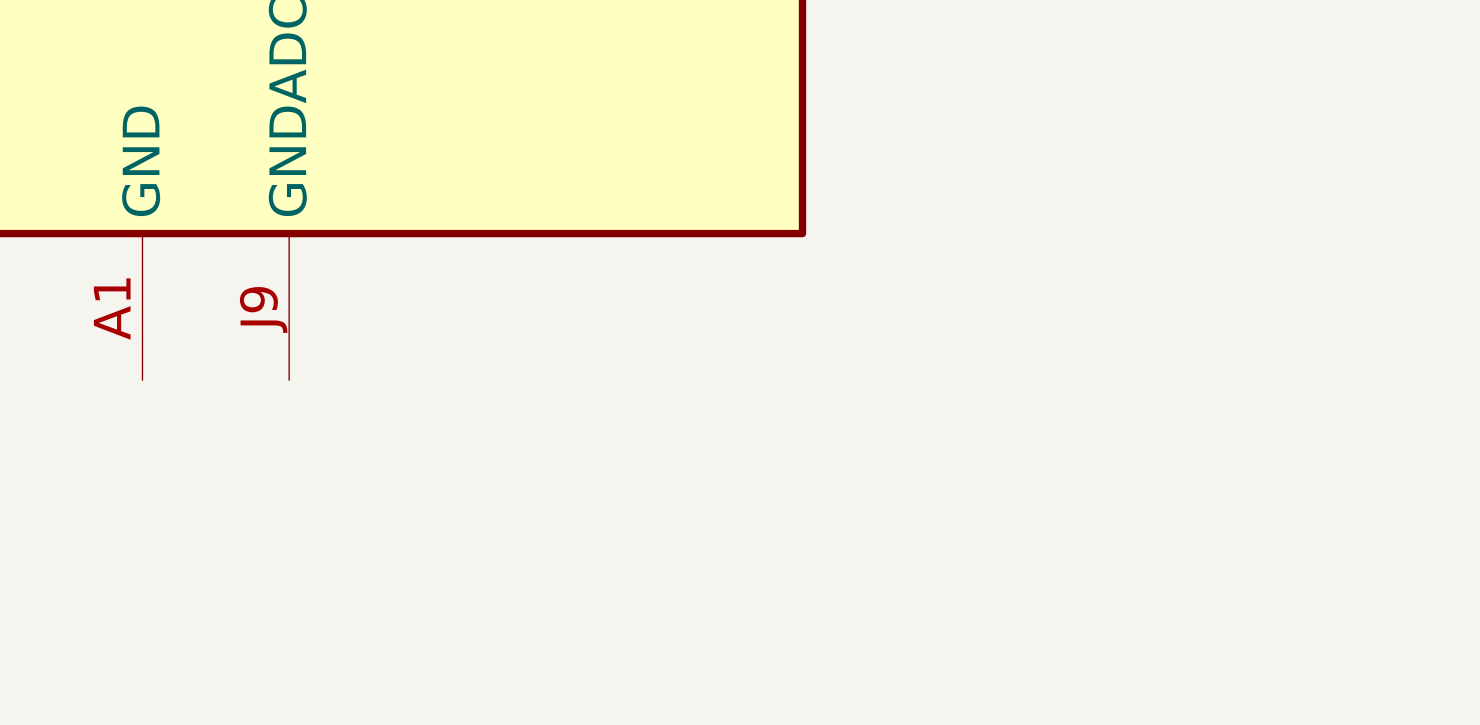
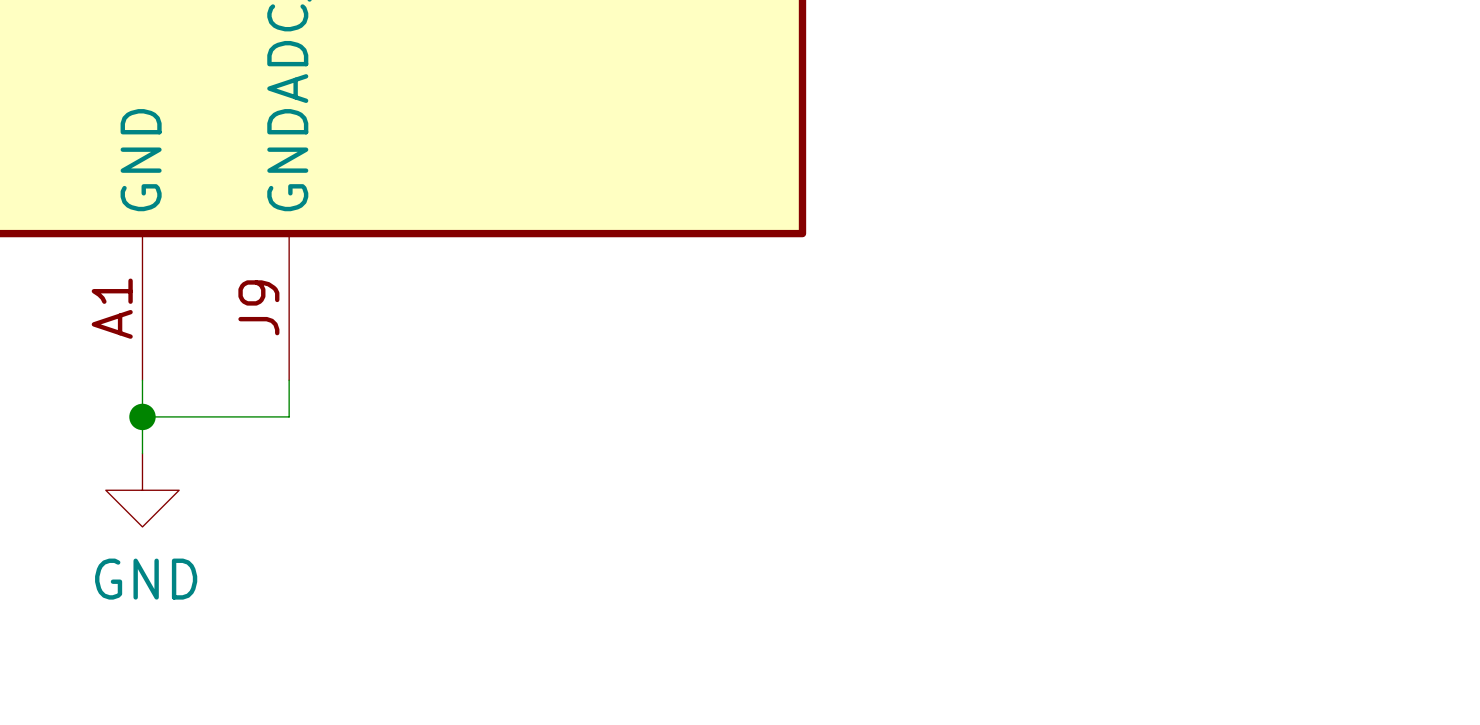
wire: none -> (142, 380) (142, 453)
wire: none -> (289, 380) (289, 416) (142, 416)
junction: none -> (142, 416)
power symbol: none -> GND (142, 490)

